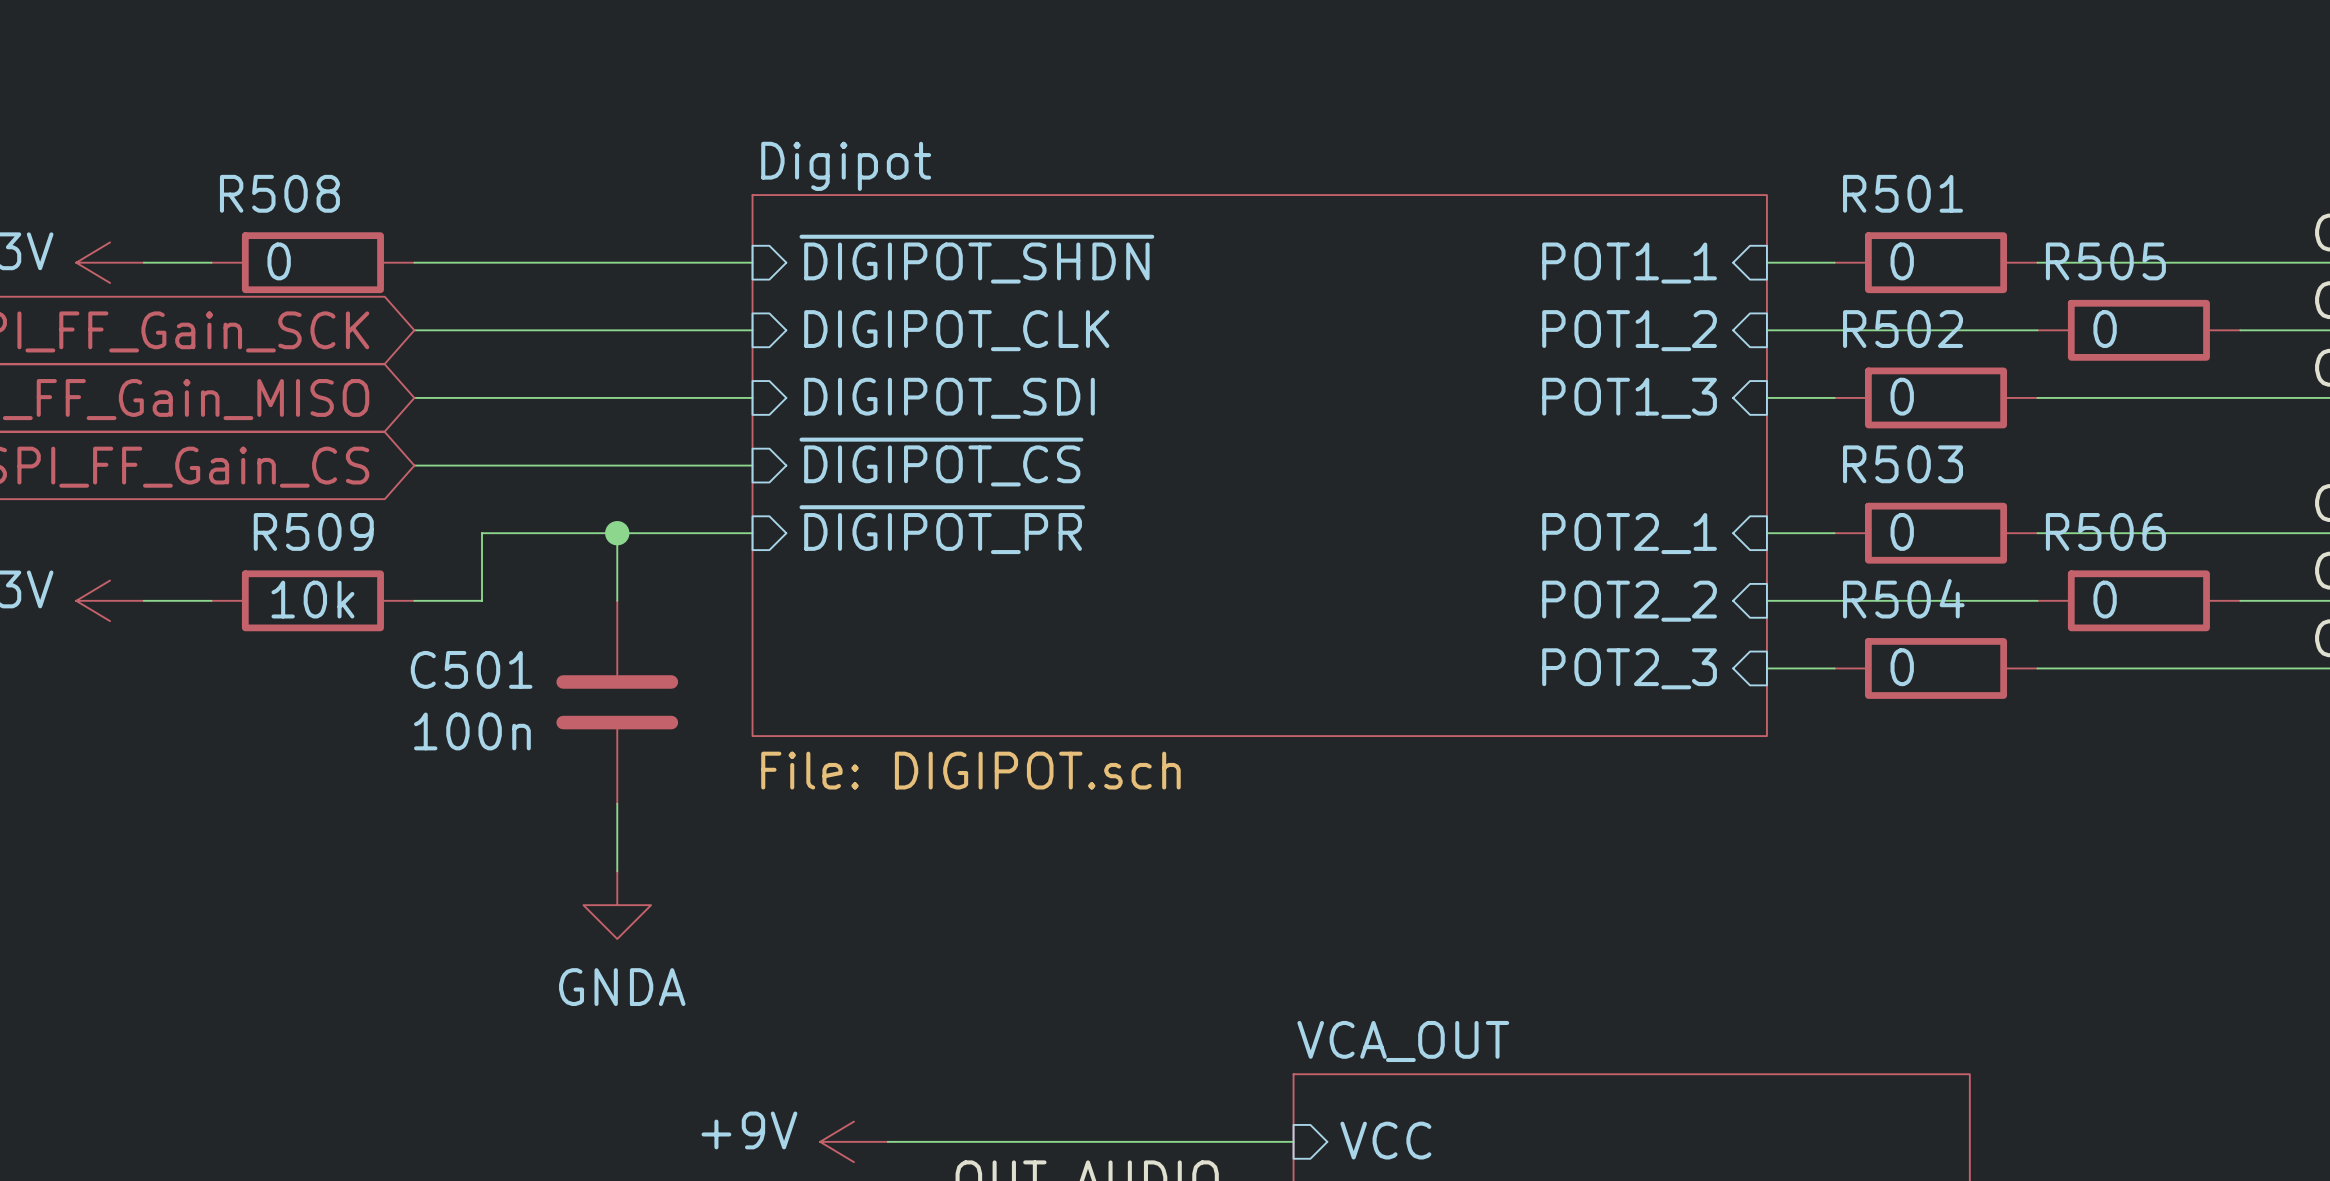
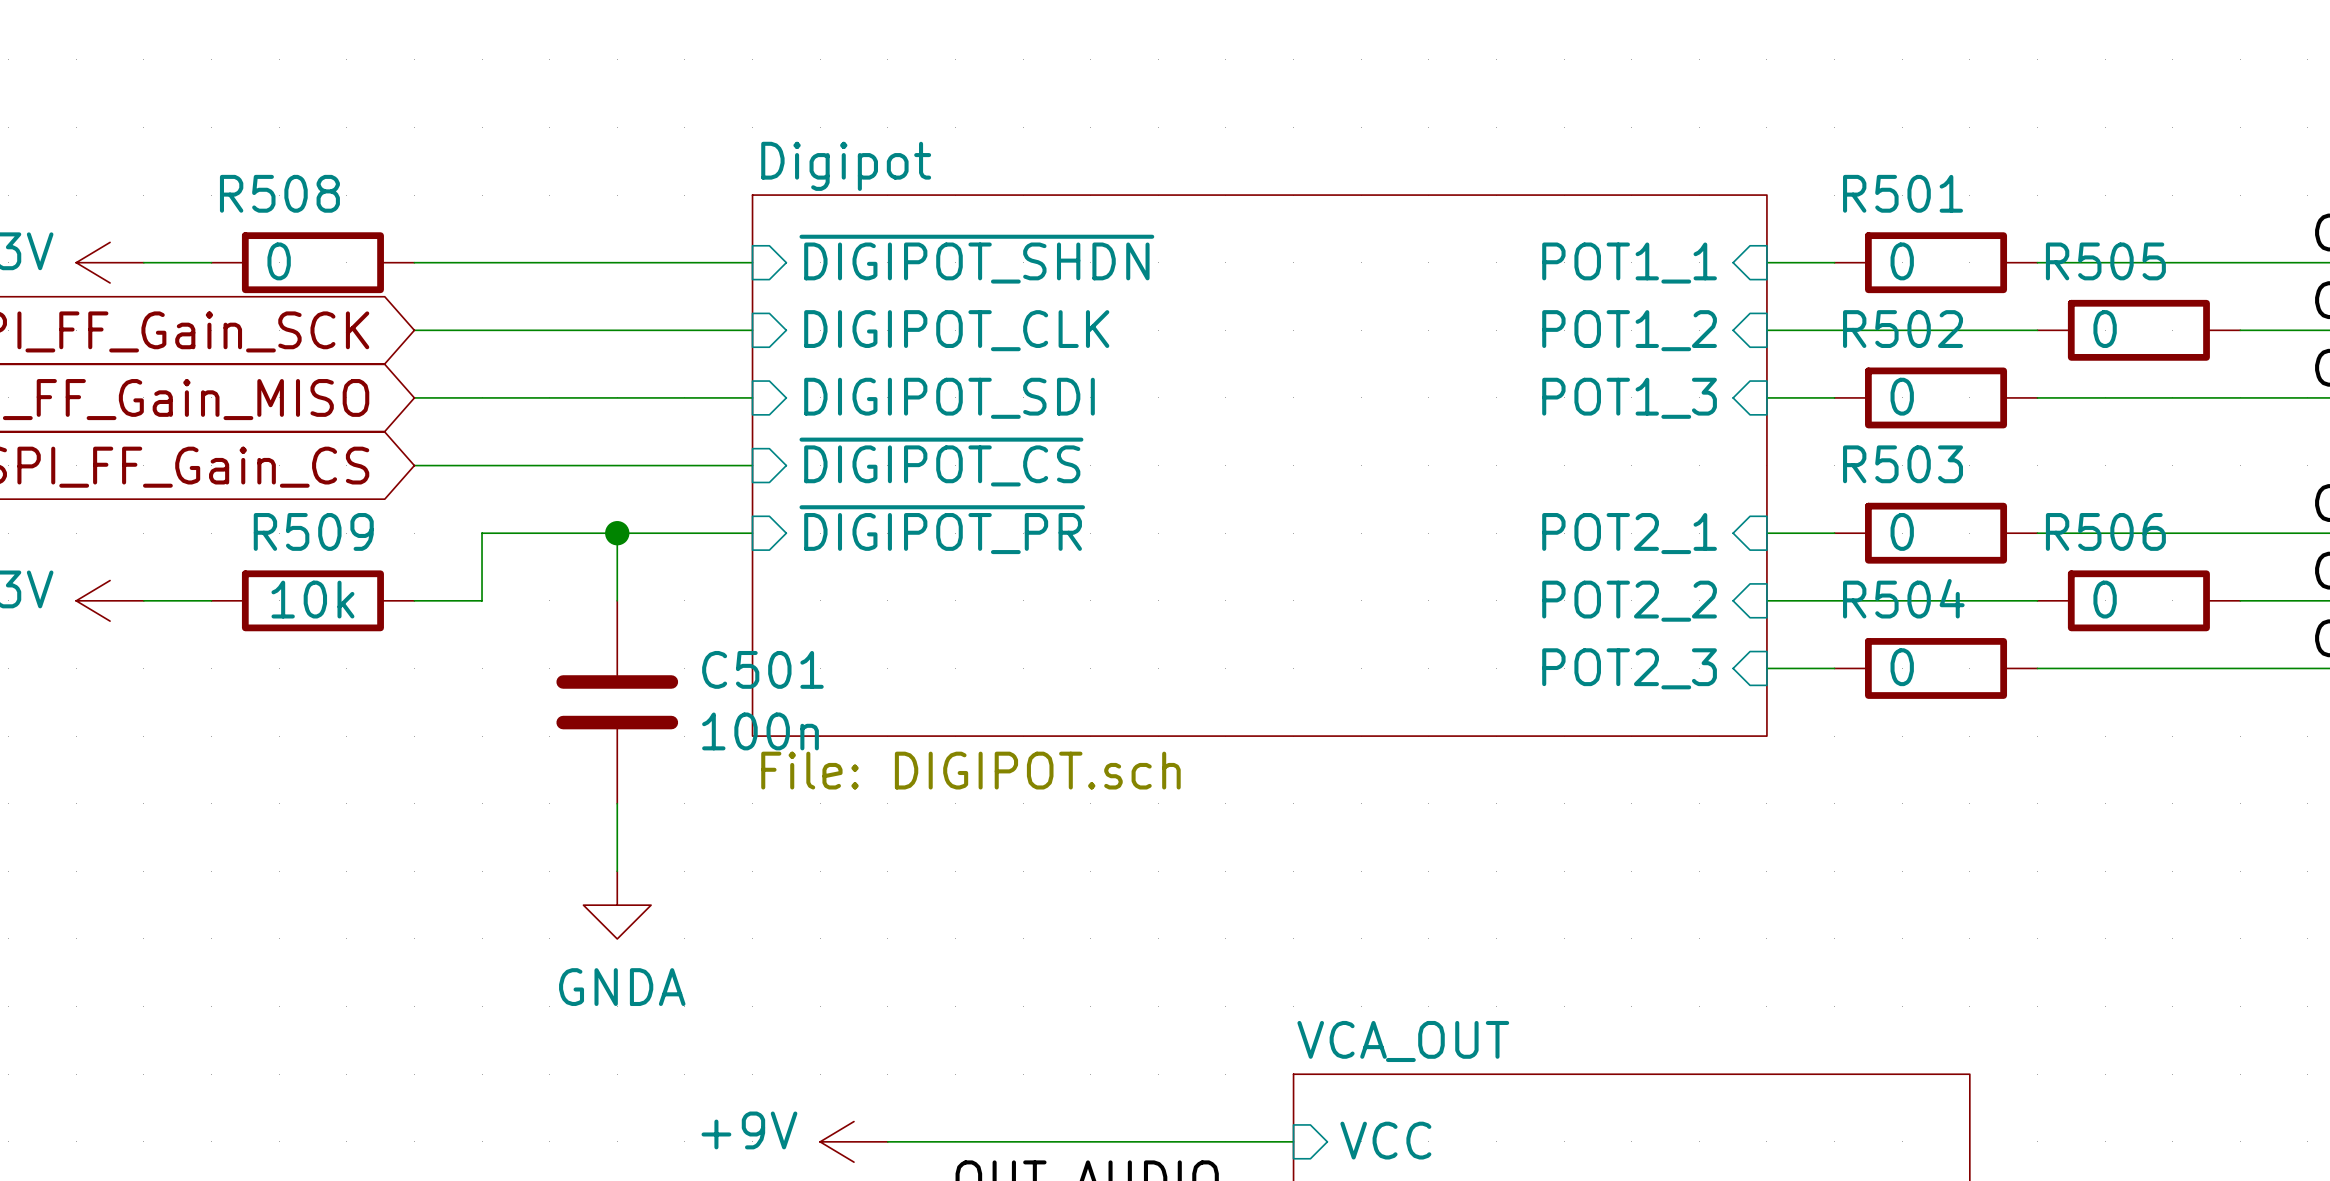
C501 name position: C501 (471, 669) -> C501 (762, 669)
C501 value position: 100n (472, 731) -> 100n (760, 731)

